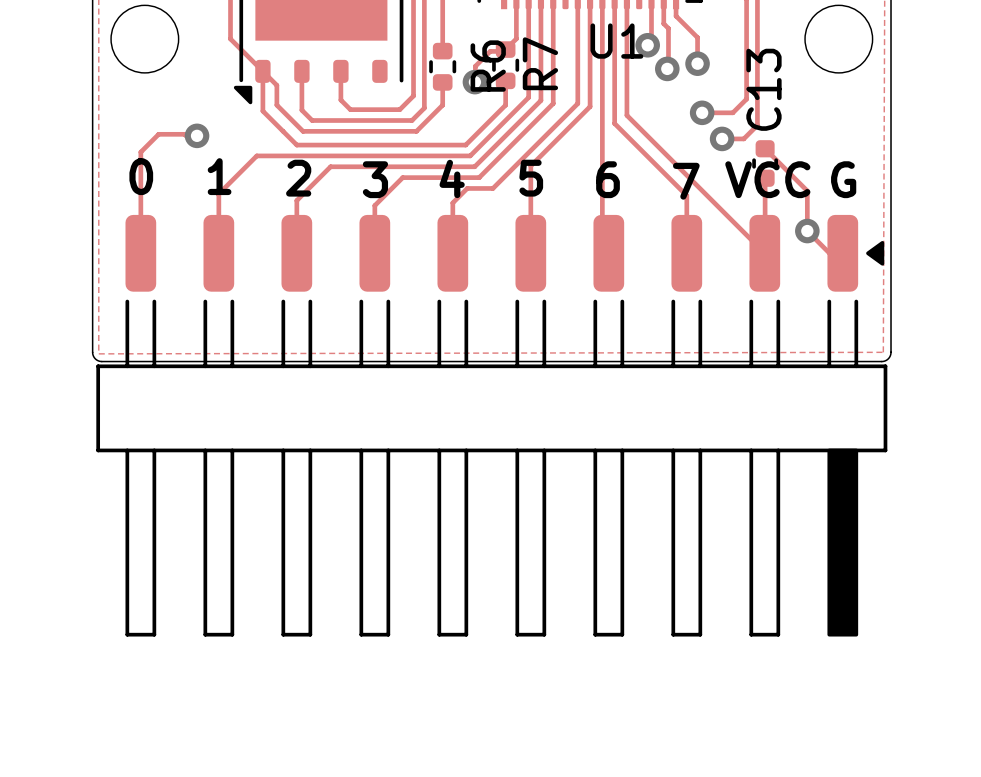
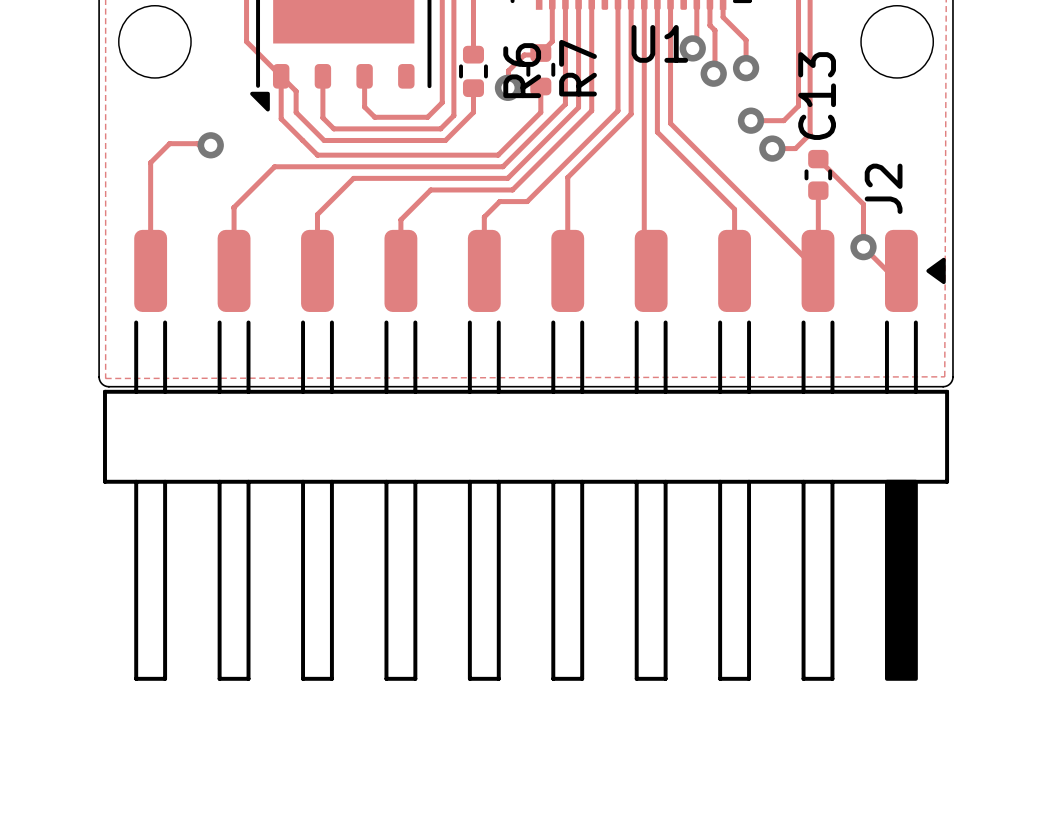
text: 0 (141, 176) -> none
text: 1 (219, 176) -> none
J2 name: none -> J2 (883, 188)
text: 2 (298, 178) -> none
text: 4 (452, 178) -> none
text: 5 (531, 178) -> none
text: 3 (375, 179) -> none
text: 6 (608, 179) -> none
text: VCC (767, 179) -> none
text: G (843, 179) -> none
text: 7 (686, 181) -> none

